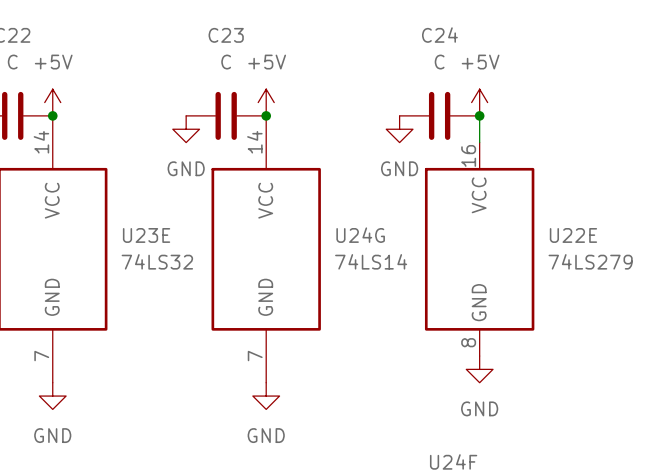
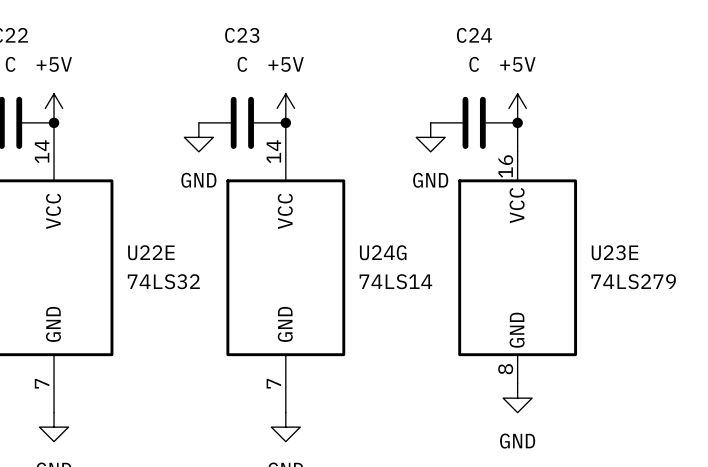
U23E name: U23E (146, 235) -> U22E (151, 252)
U22E name: U22E (573, 235) -> U23E (614, 252)

